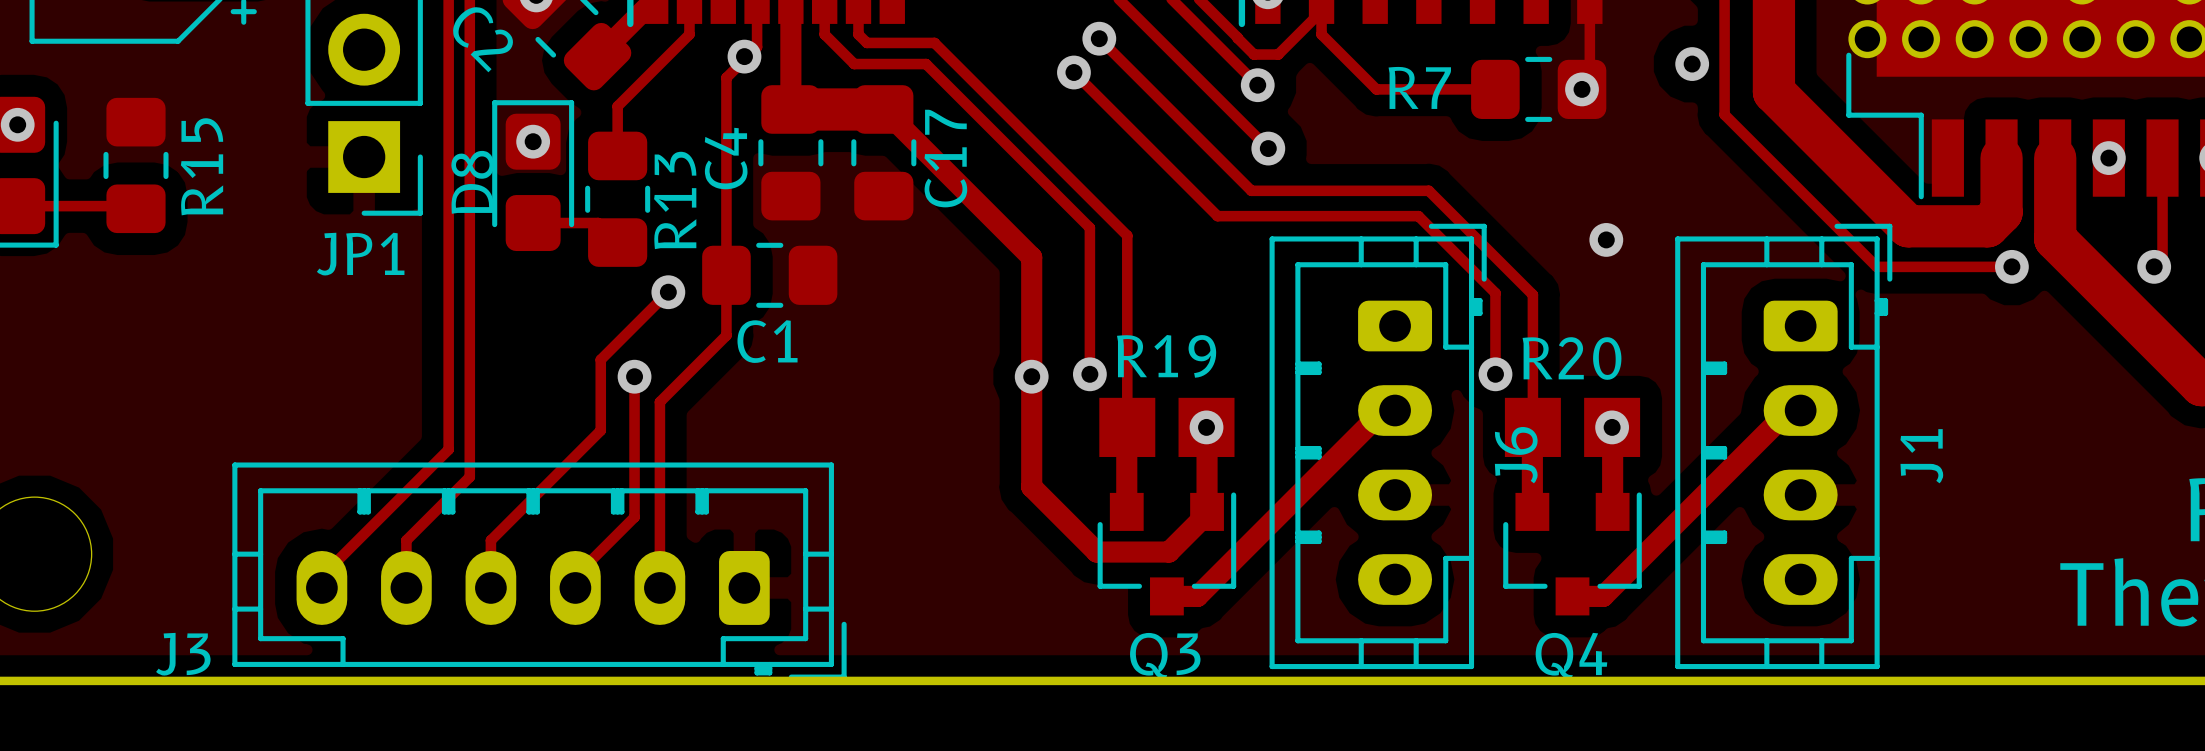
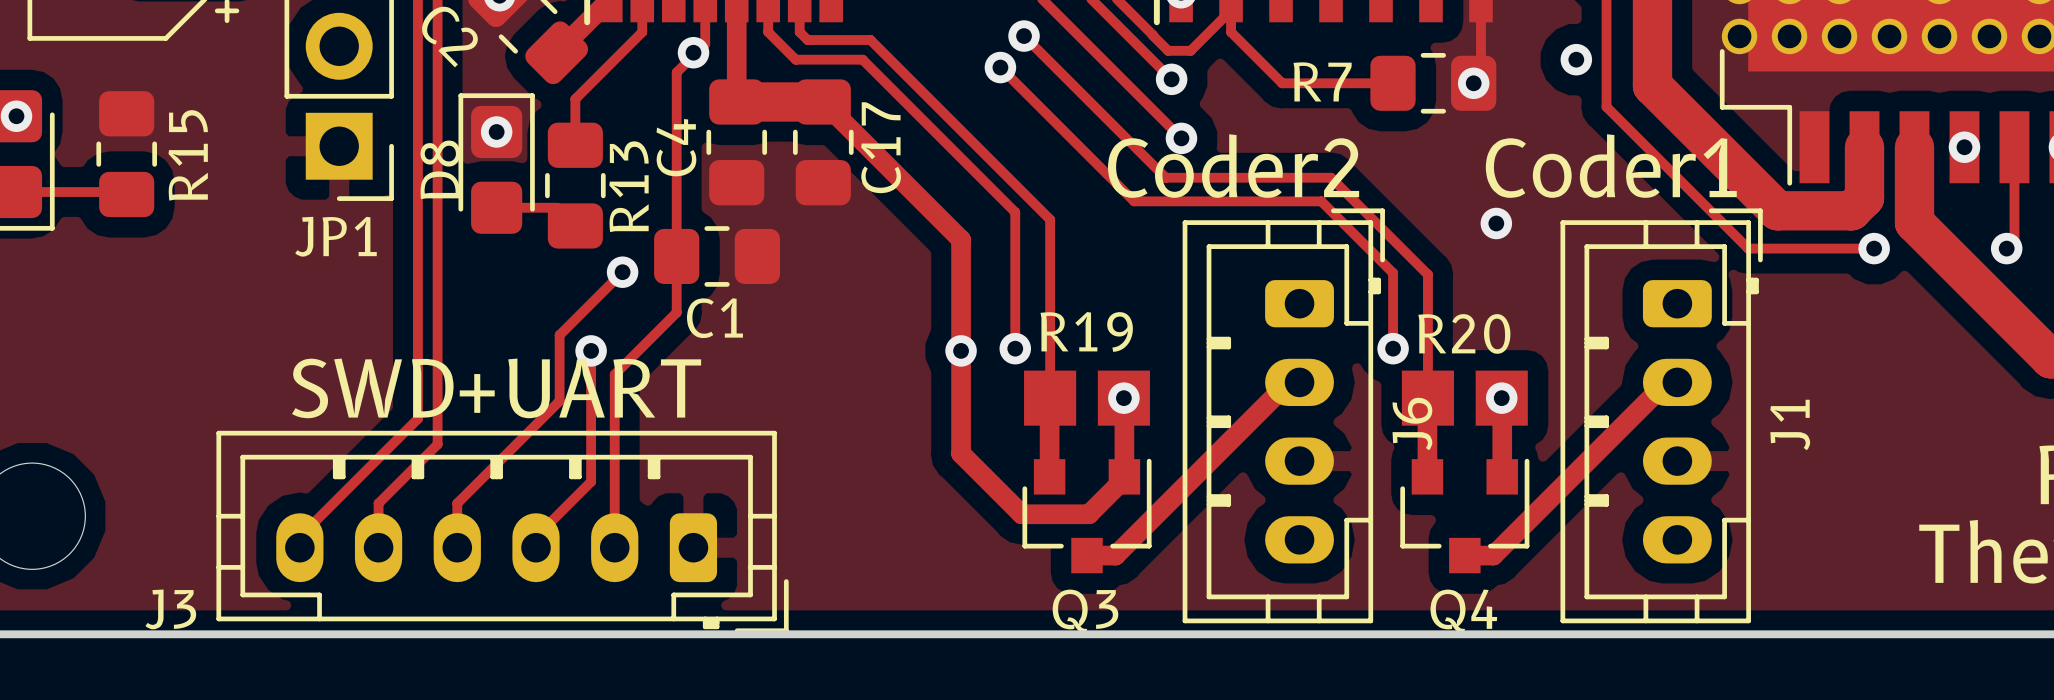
text: none -> Coder2 (1233, 166)
text: none -> Coder1 (1611, 166)
text: none -> SWD+UART (496, 388)

